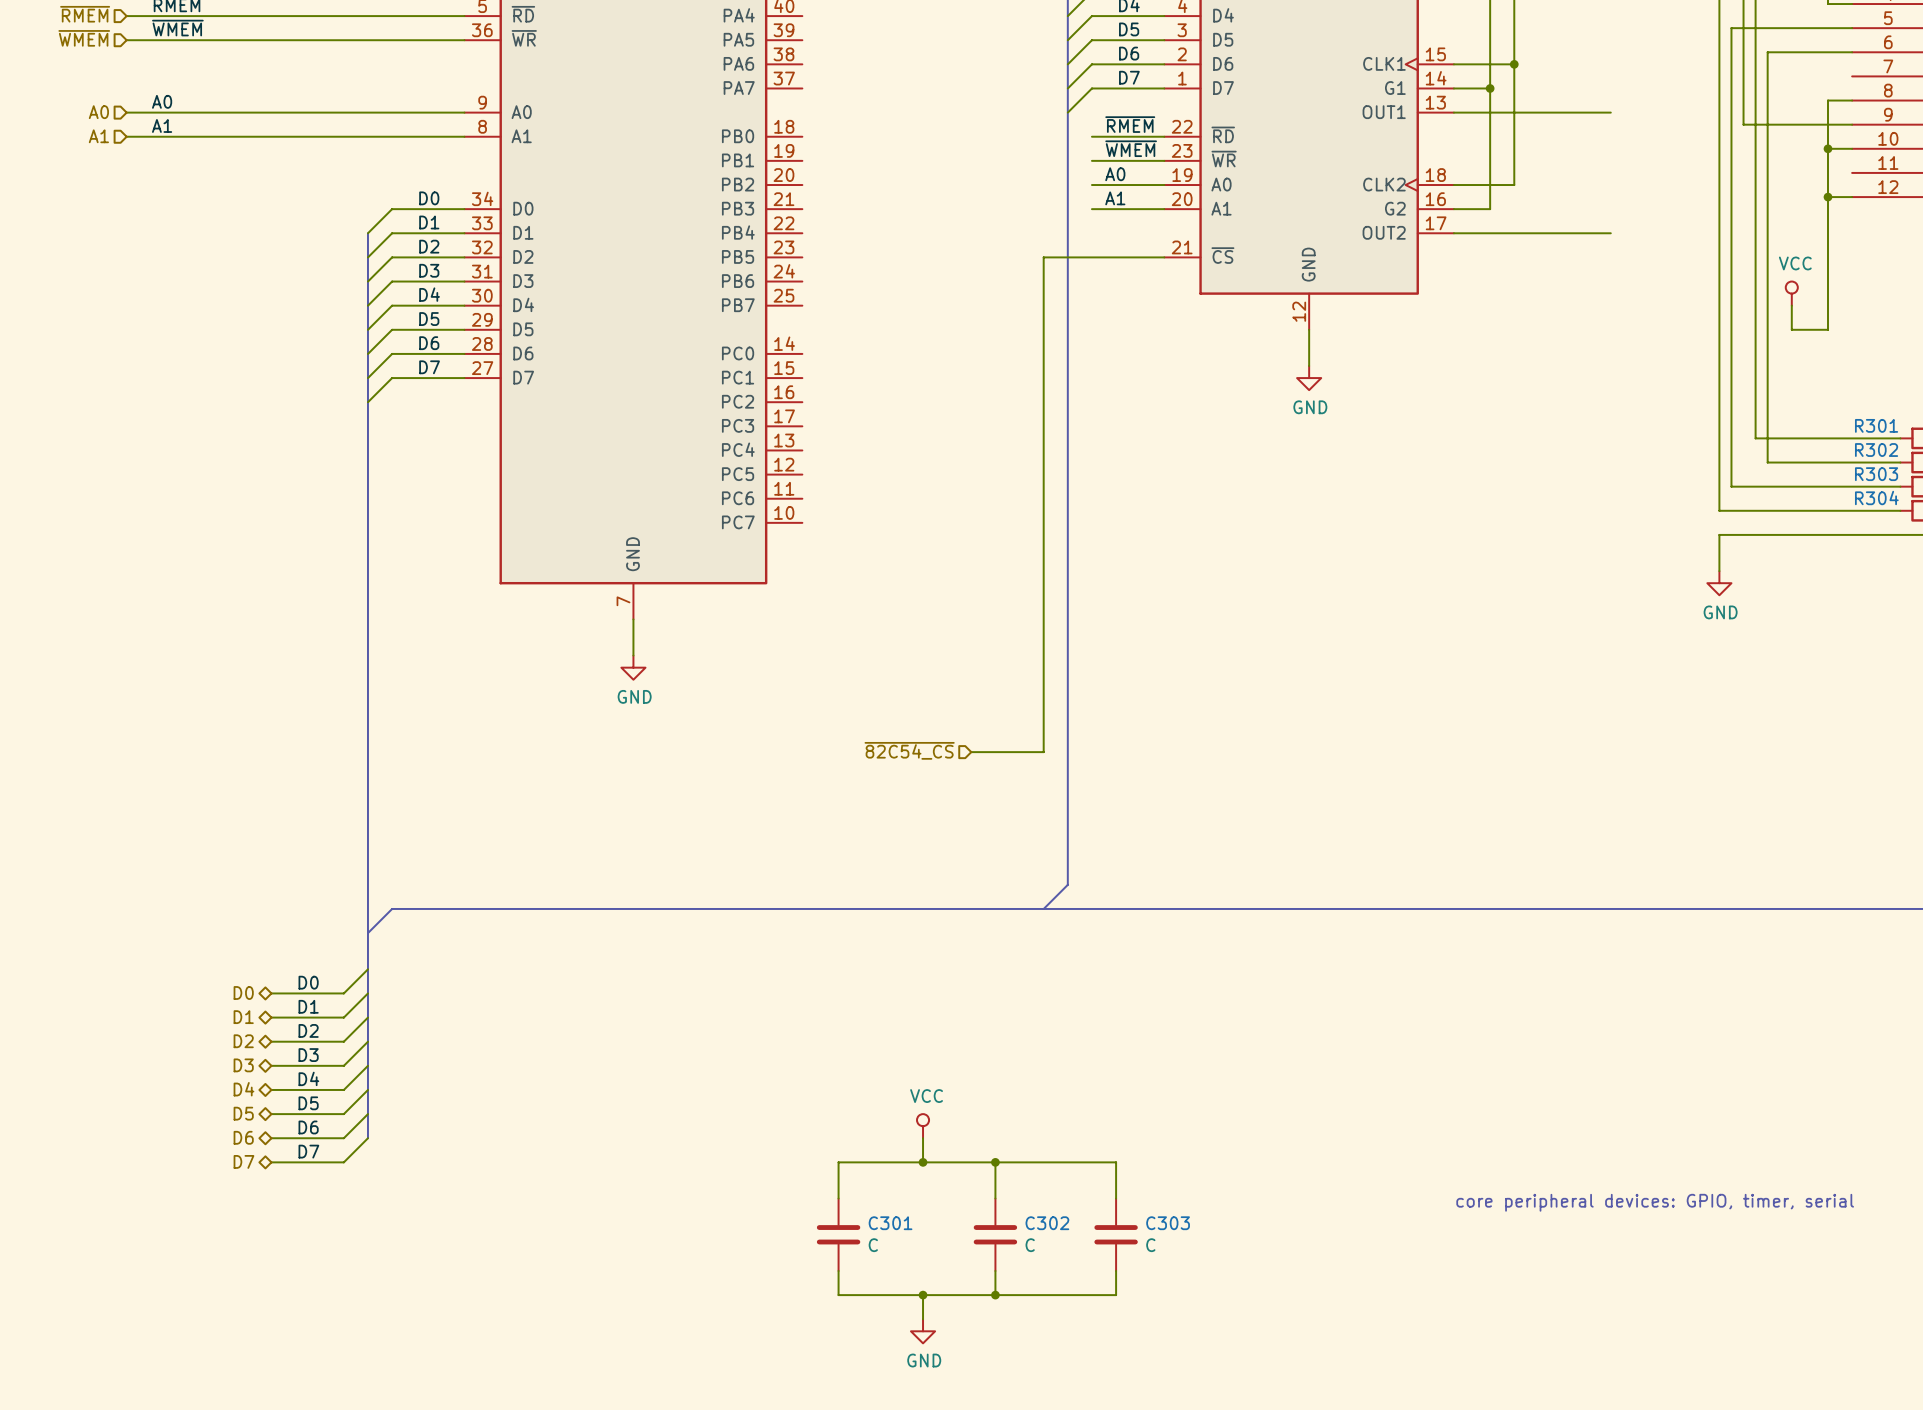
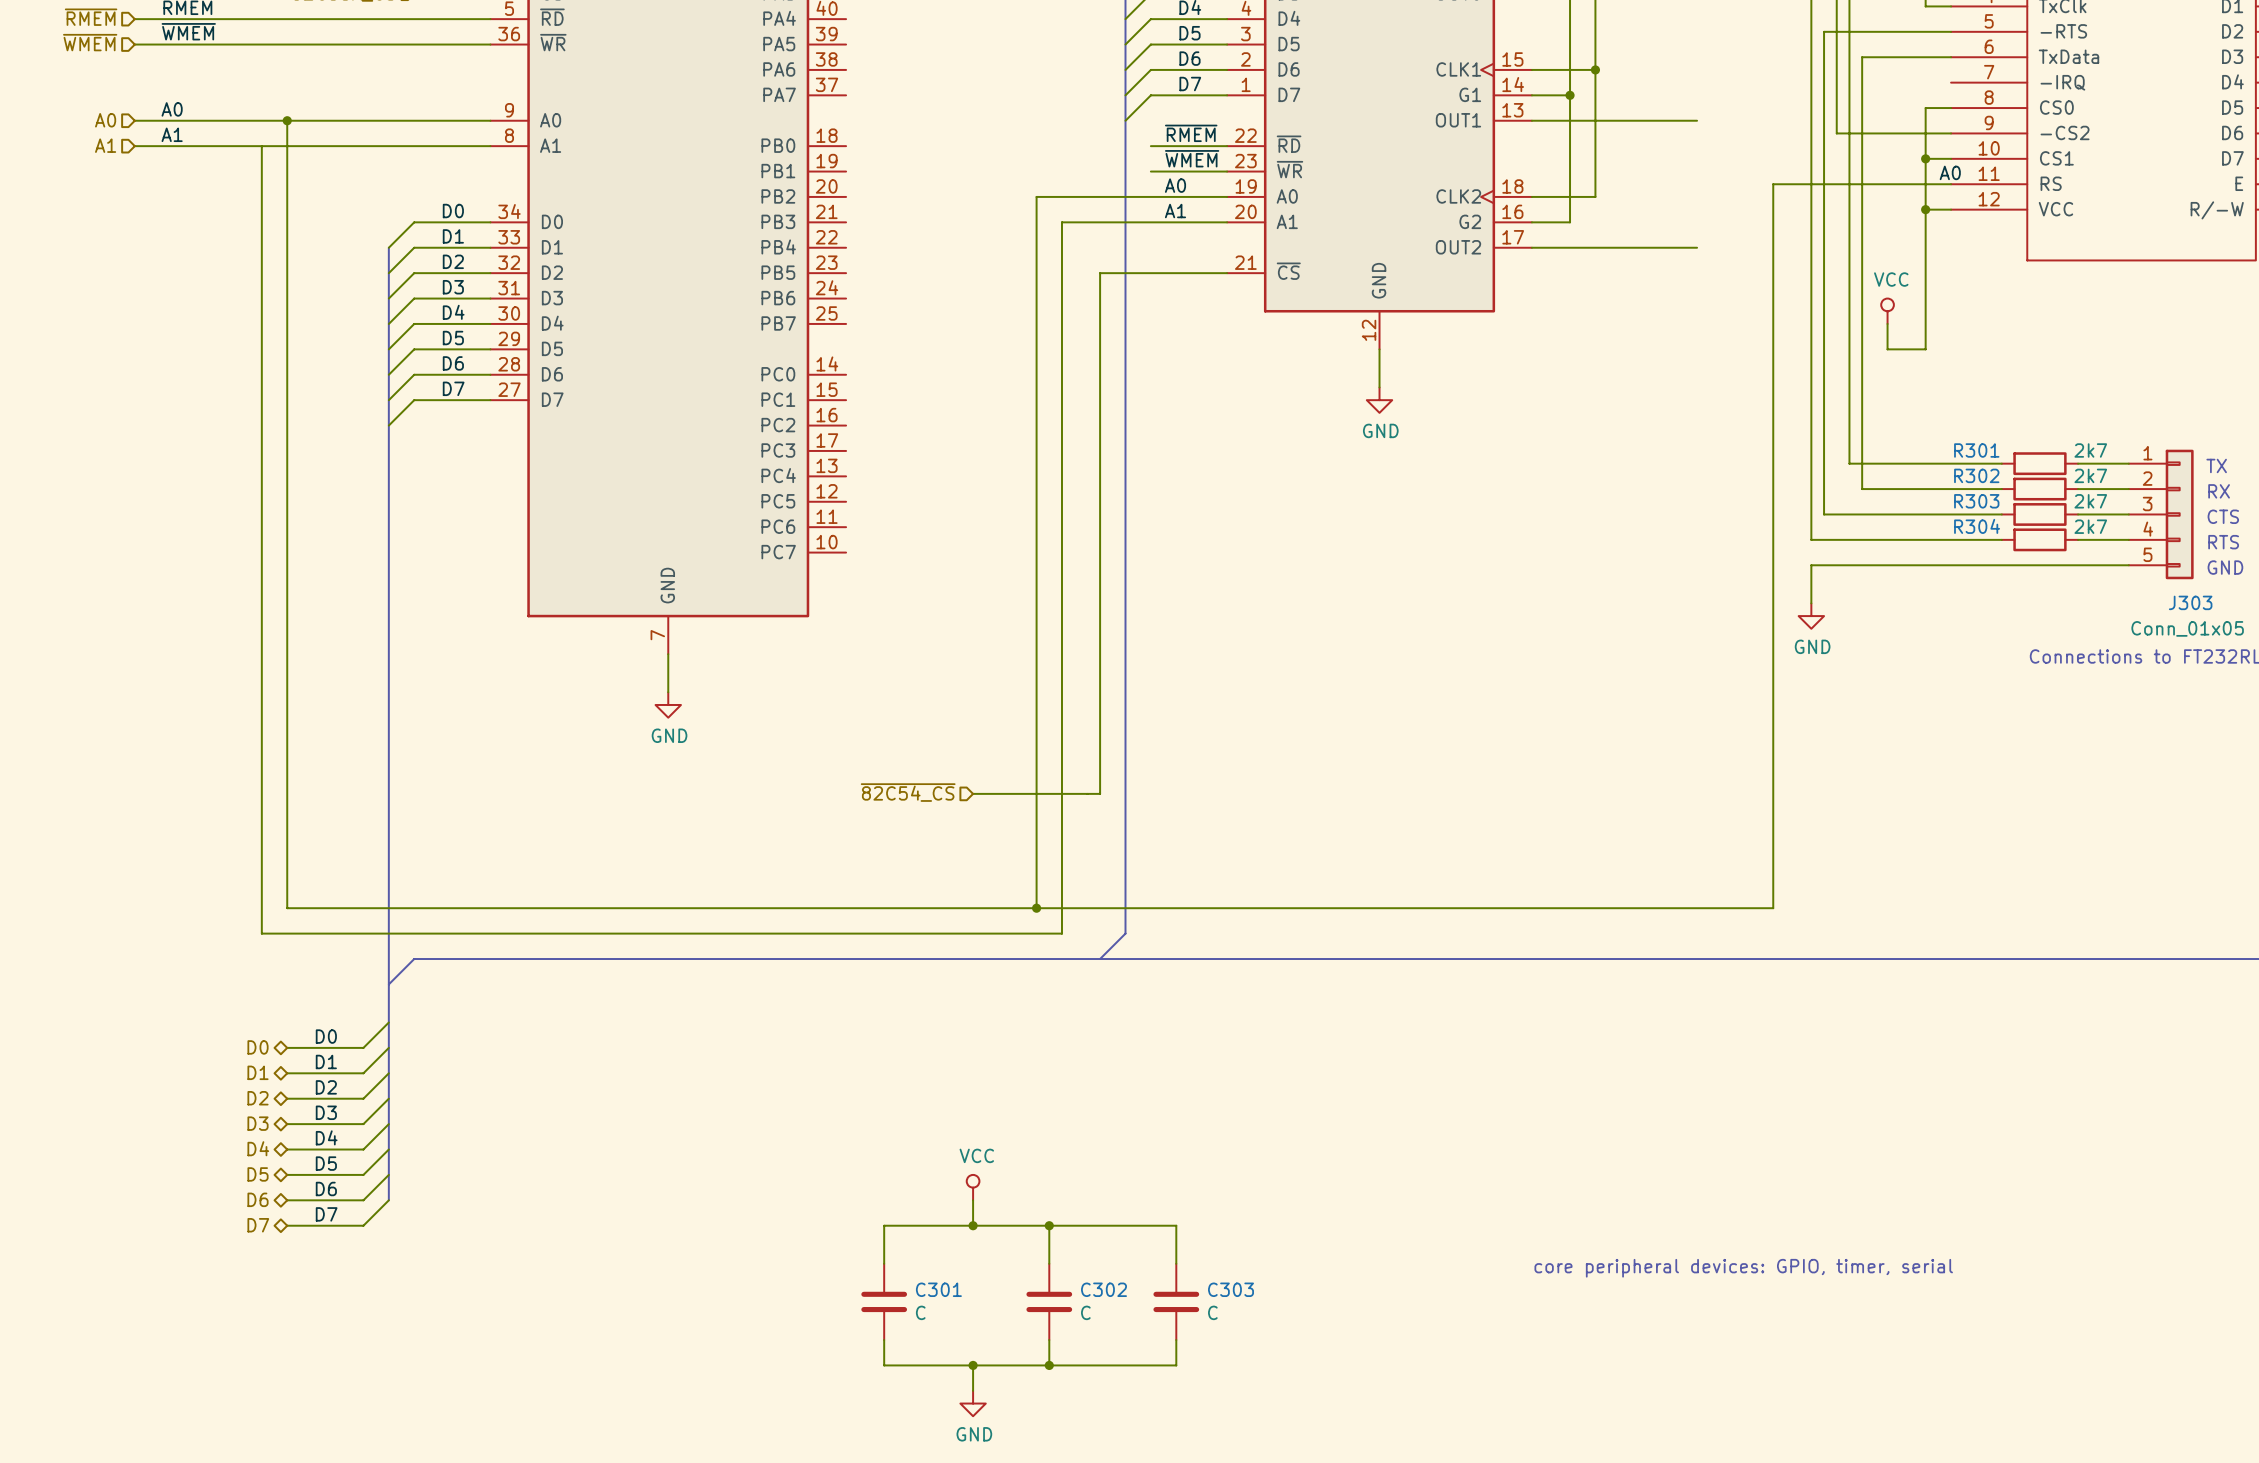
wire: none -> (287, 120) (287, 908) (1773, 908) (1773, 184) (1951, 184)
junction: none -> (287, 120)
wire: none -> (261, 146) (261, 933) (1061, 933) (1061, 222) (1150, 222)
label: none -> A0 (1950, 172)
wire: none -> (1150, 196) (1036, 196) (1036, 908)
hierarchical label position: ~{82C54_CS} (909, 750) -> ~{82C54_CS} (908, 792)
wire: none -> (973, 793) (1023, 793)
junction: none -> (1036, 908)

